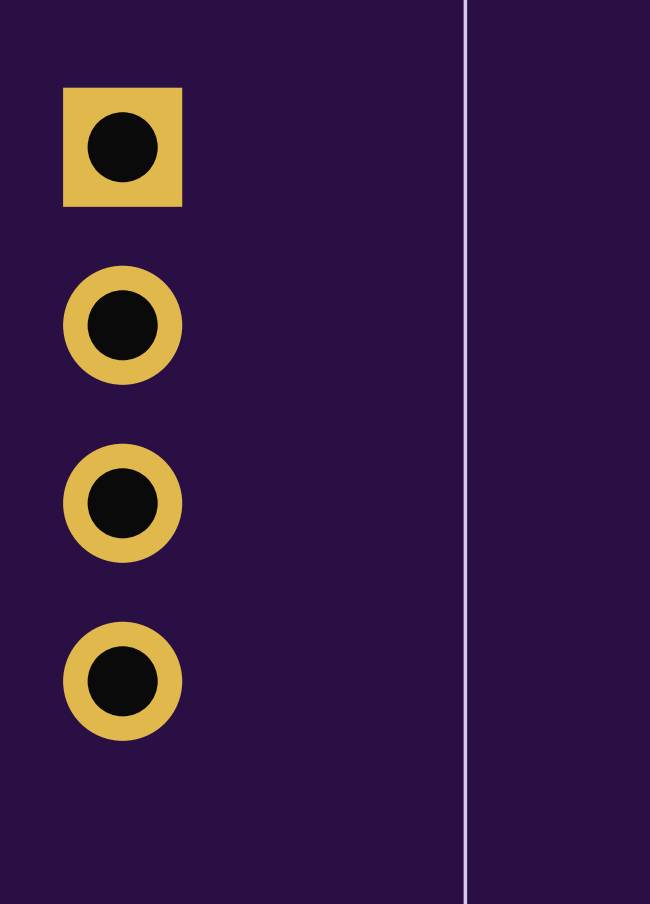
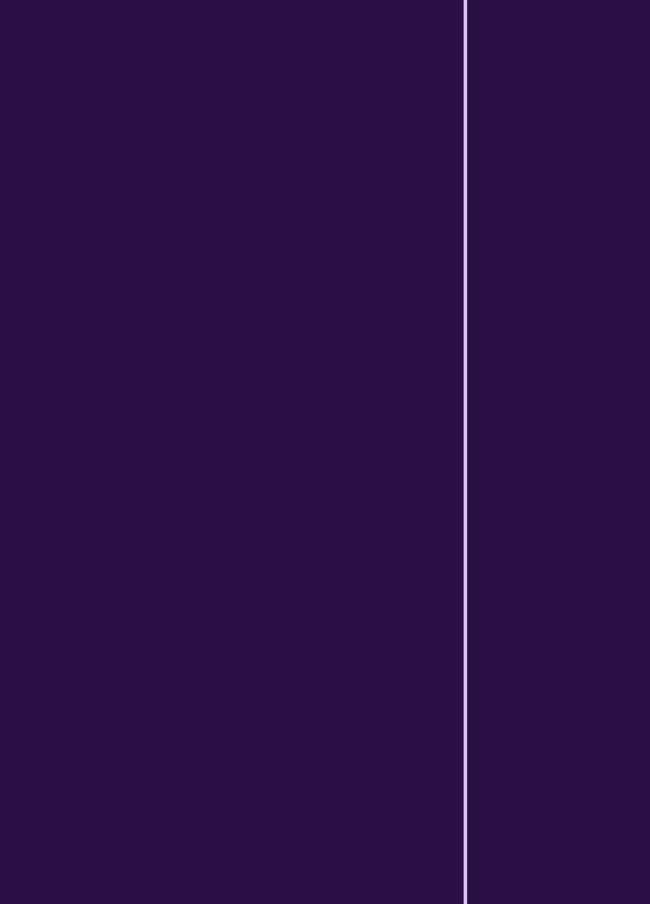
part: (122, 414) -> none

